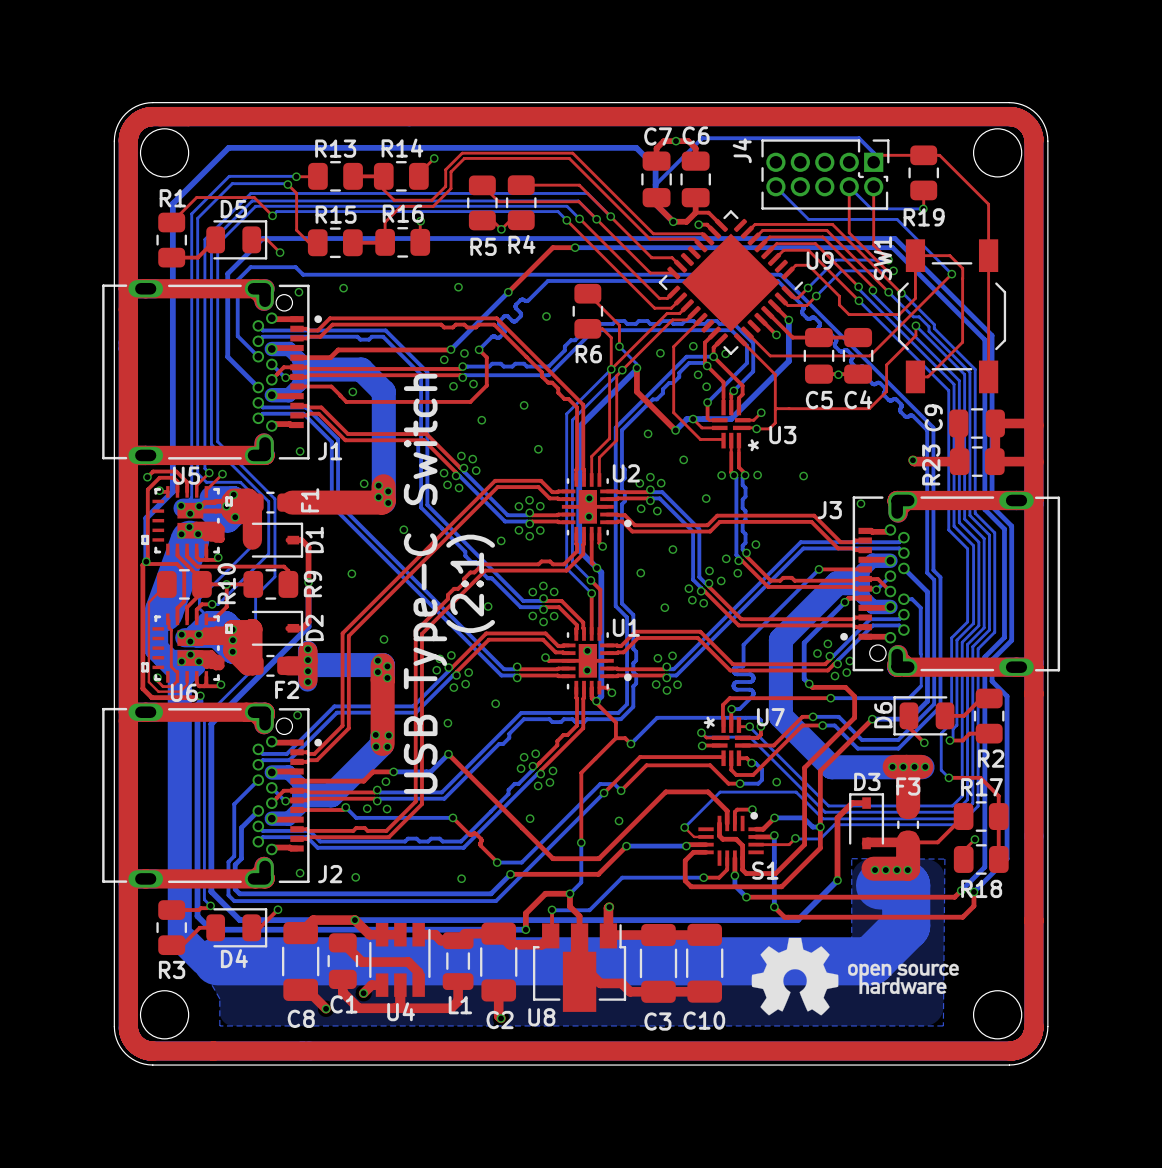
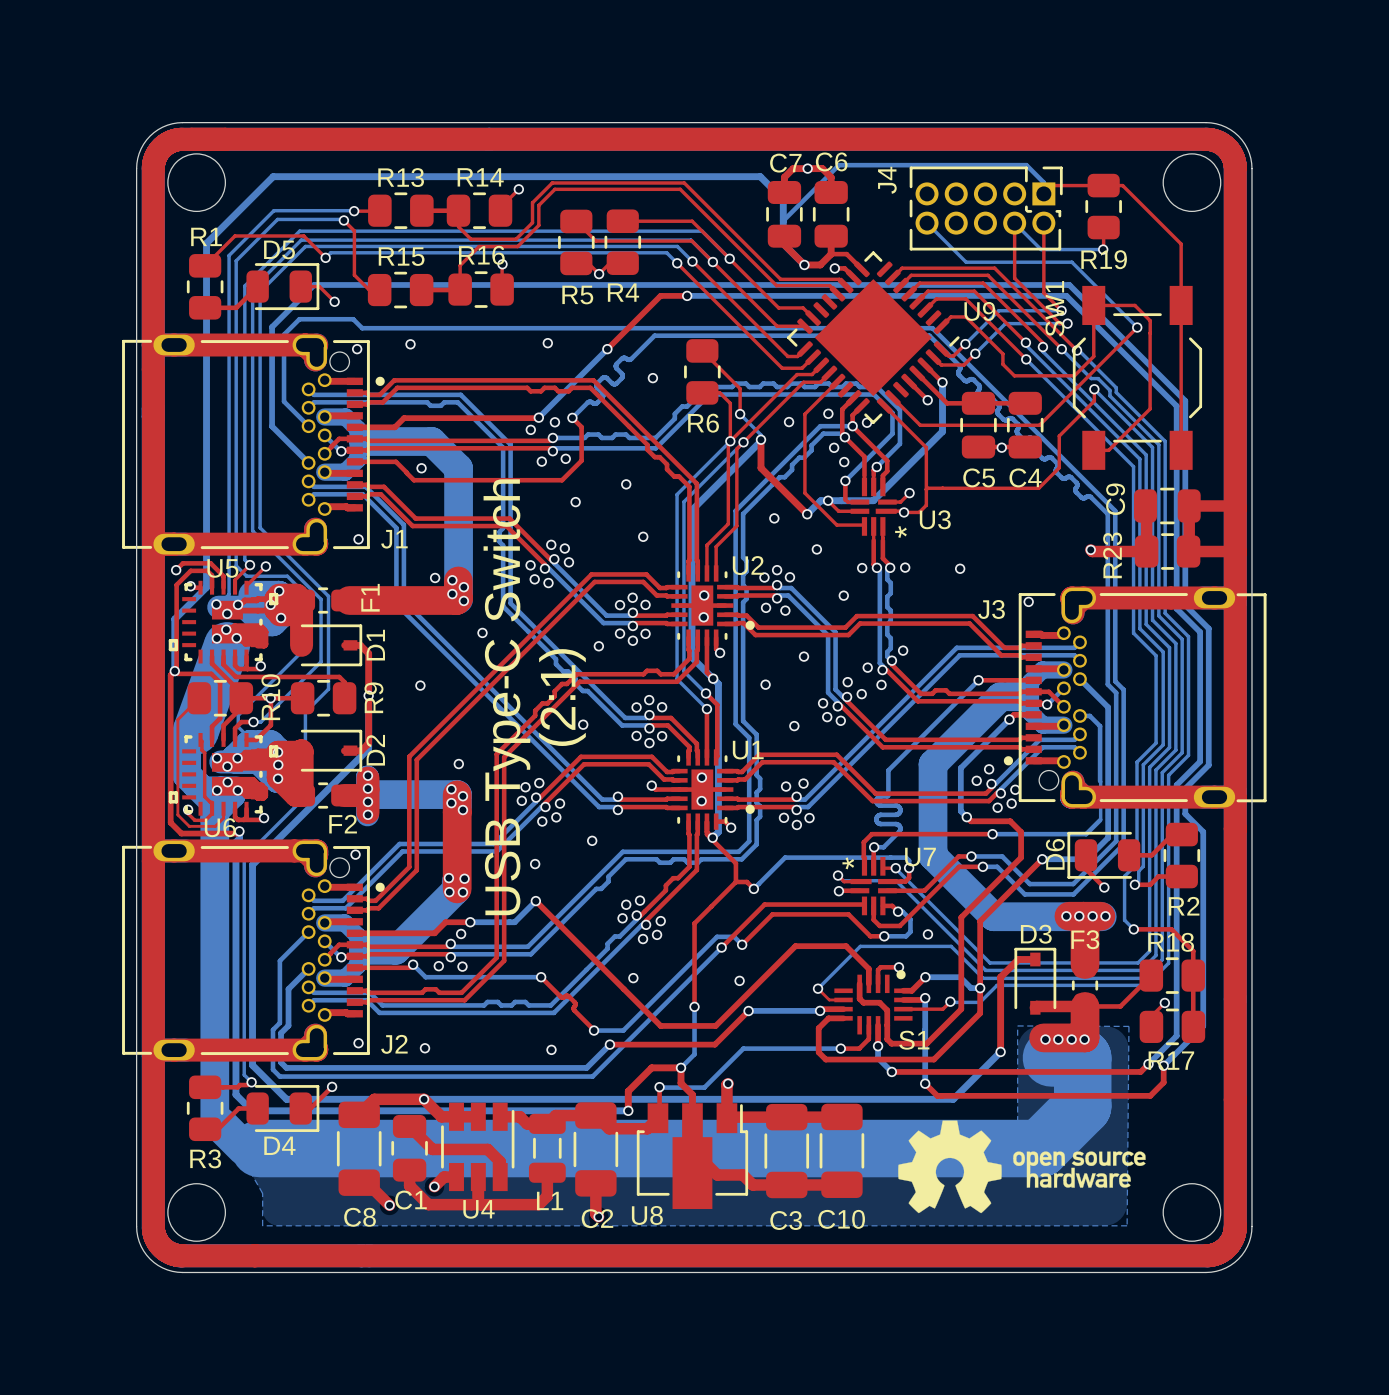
R17 name position: R17 (982, 787) -> R17 (1171, 1060)
R18 name position: R18 (981, 888) -> R18 (1171, 942)

